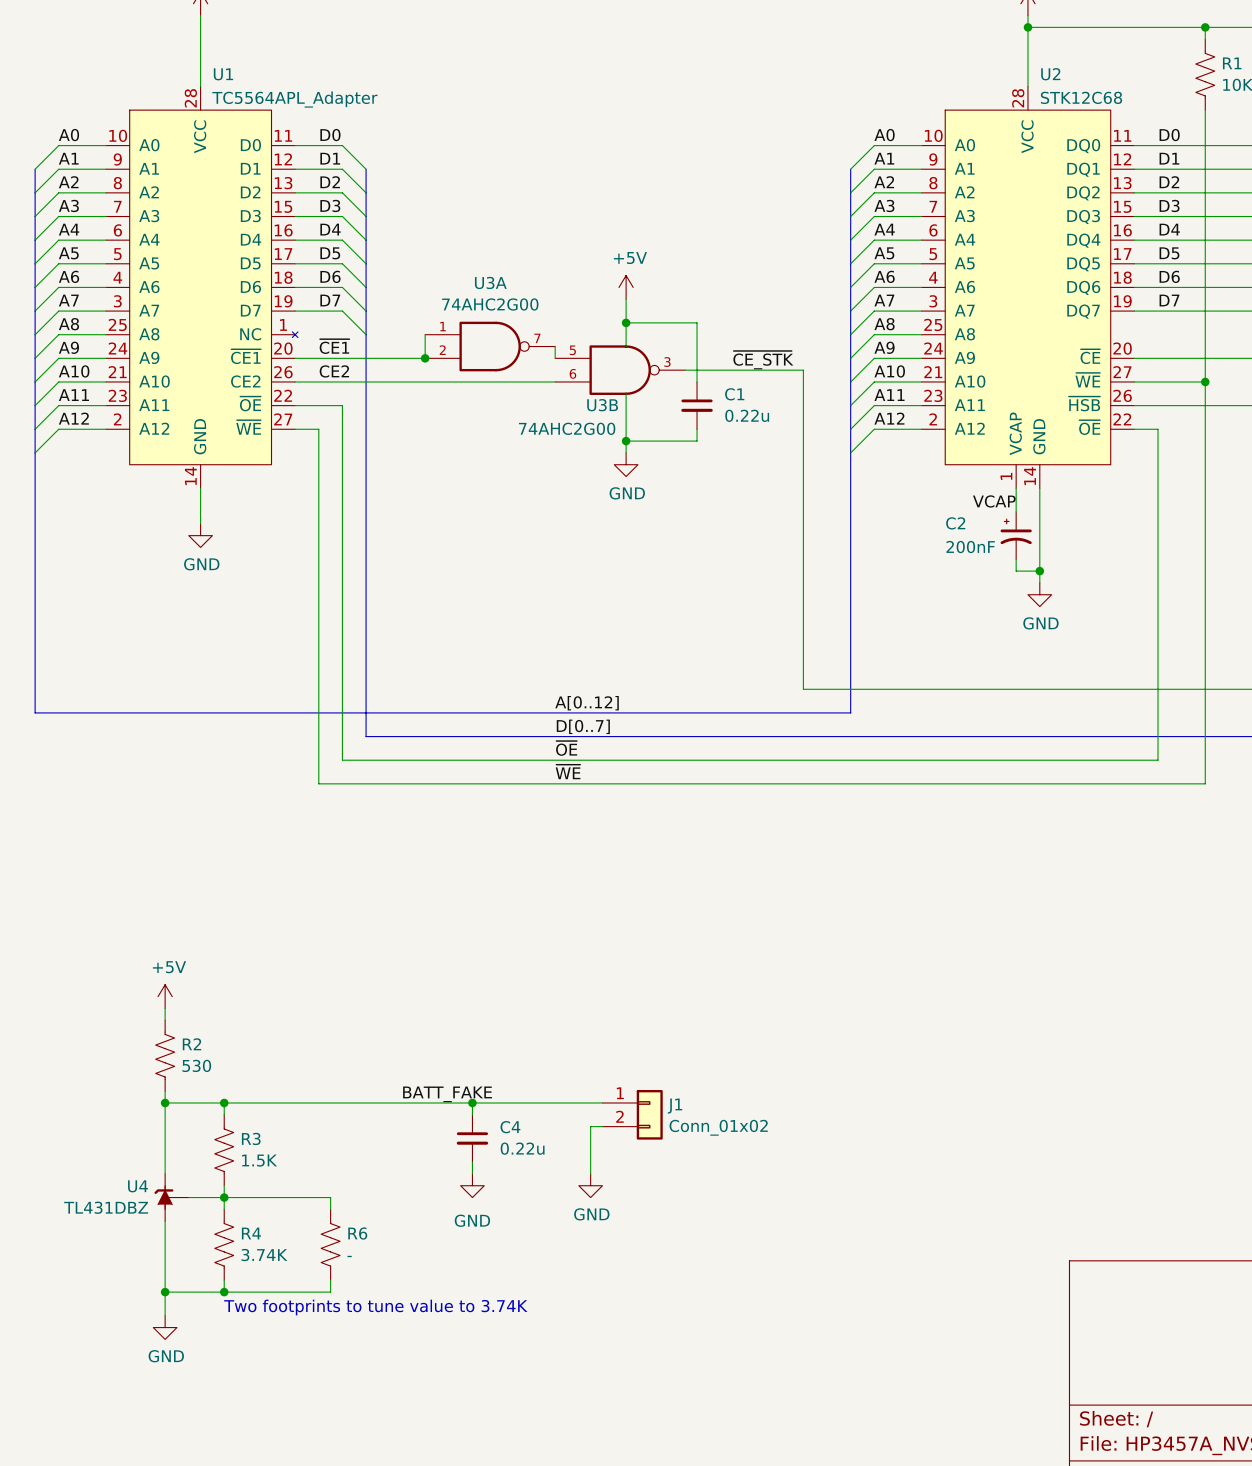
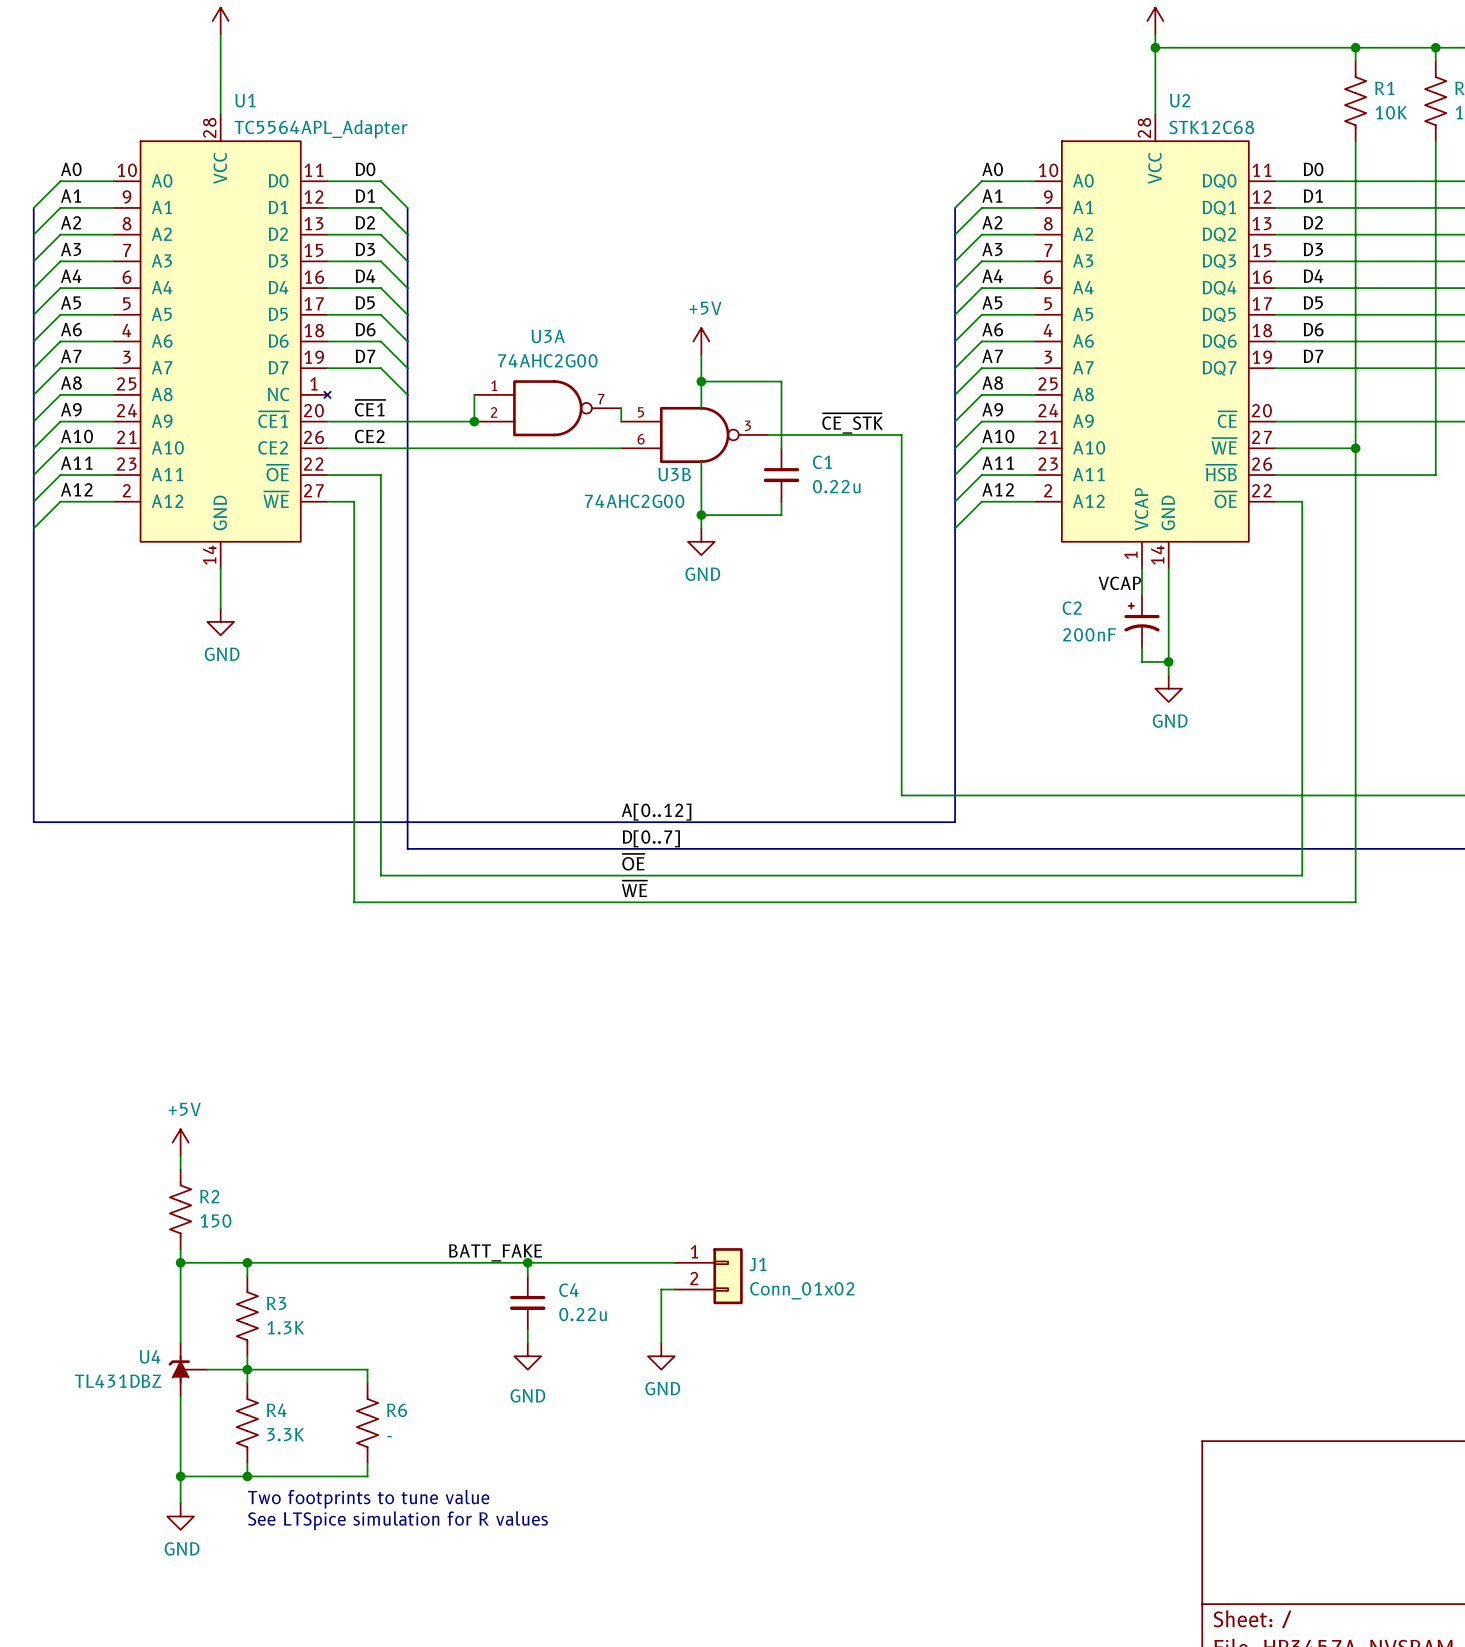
R2 value: 530 (196, 1065) -> 150 (215, 1221)
R3 value: 1.5K (259, 1160) -> 1.3K (285, 1327)
R4 value: 3.74K (264, 1255) -> 3.3K (285, 1434)
text: Two footprints to tune value to 3.74K (375, 1307) -> Two footprints to tune value (368, 1499)
text: none -> See LTSpice simulation for R values (397, 1520)

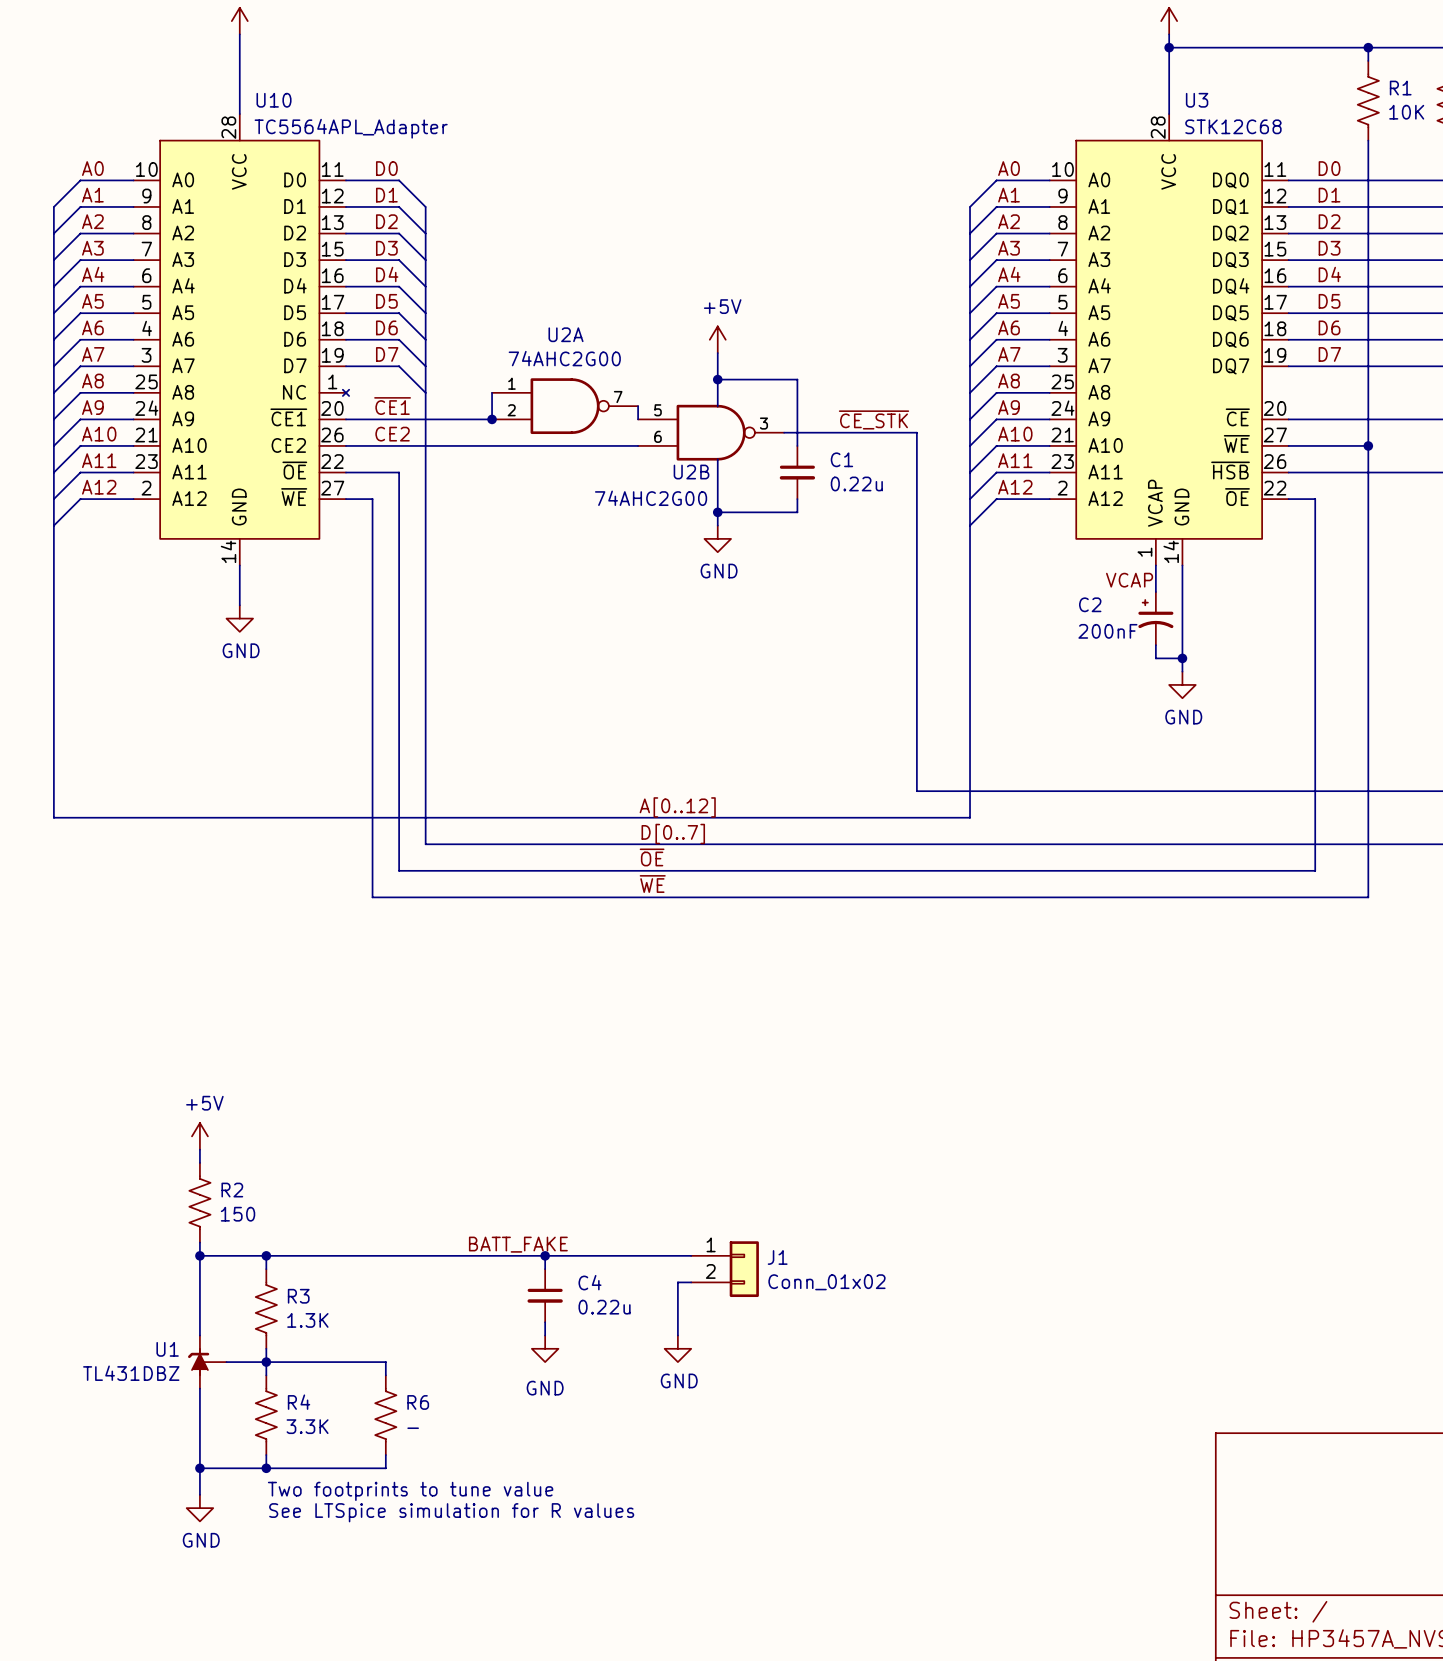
U1 name: U1 (245, 100) -> U10 (274, 100)
U2 name: U2 (1180, 100) -> U3 (1197, 100)
U3A name: U3A (548, 336) -> U2A (566, 334)
U3B name: U3B (674, 474) -> U2B (691, 472)
U4 name: U4 (150, 1356) -> U1 (167, 1349)

